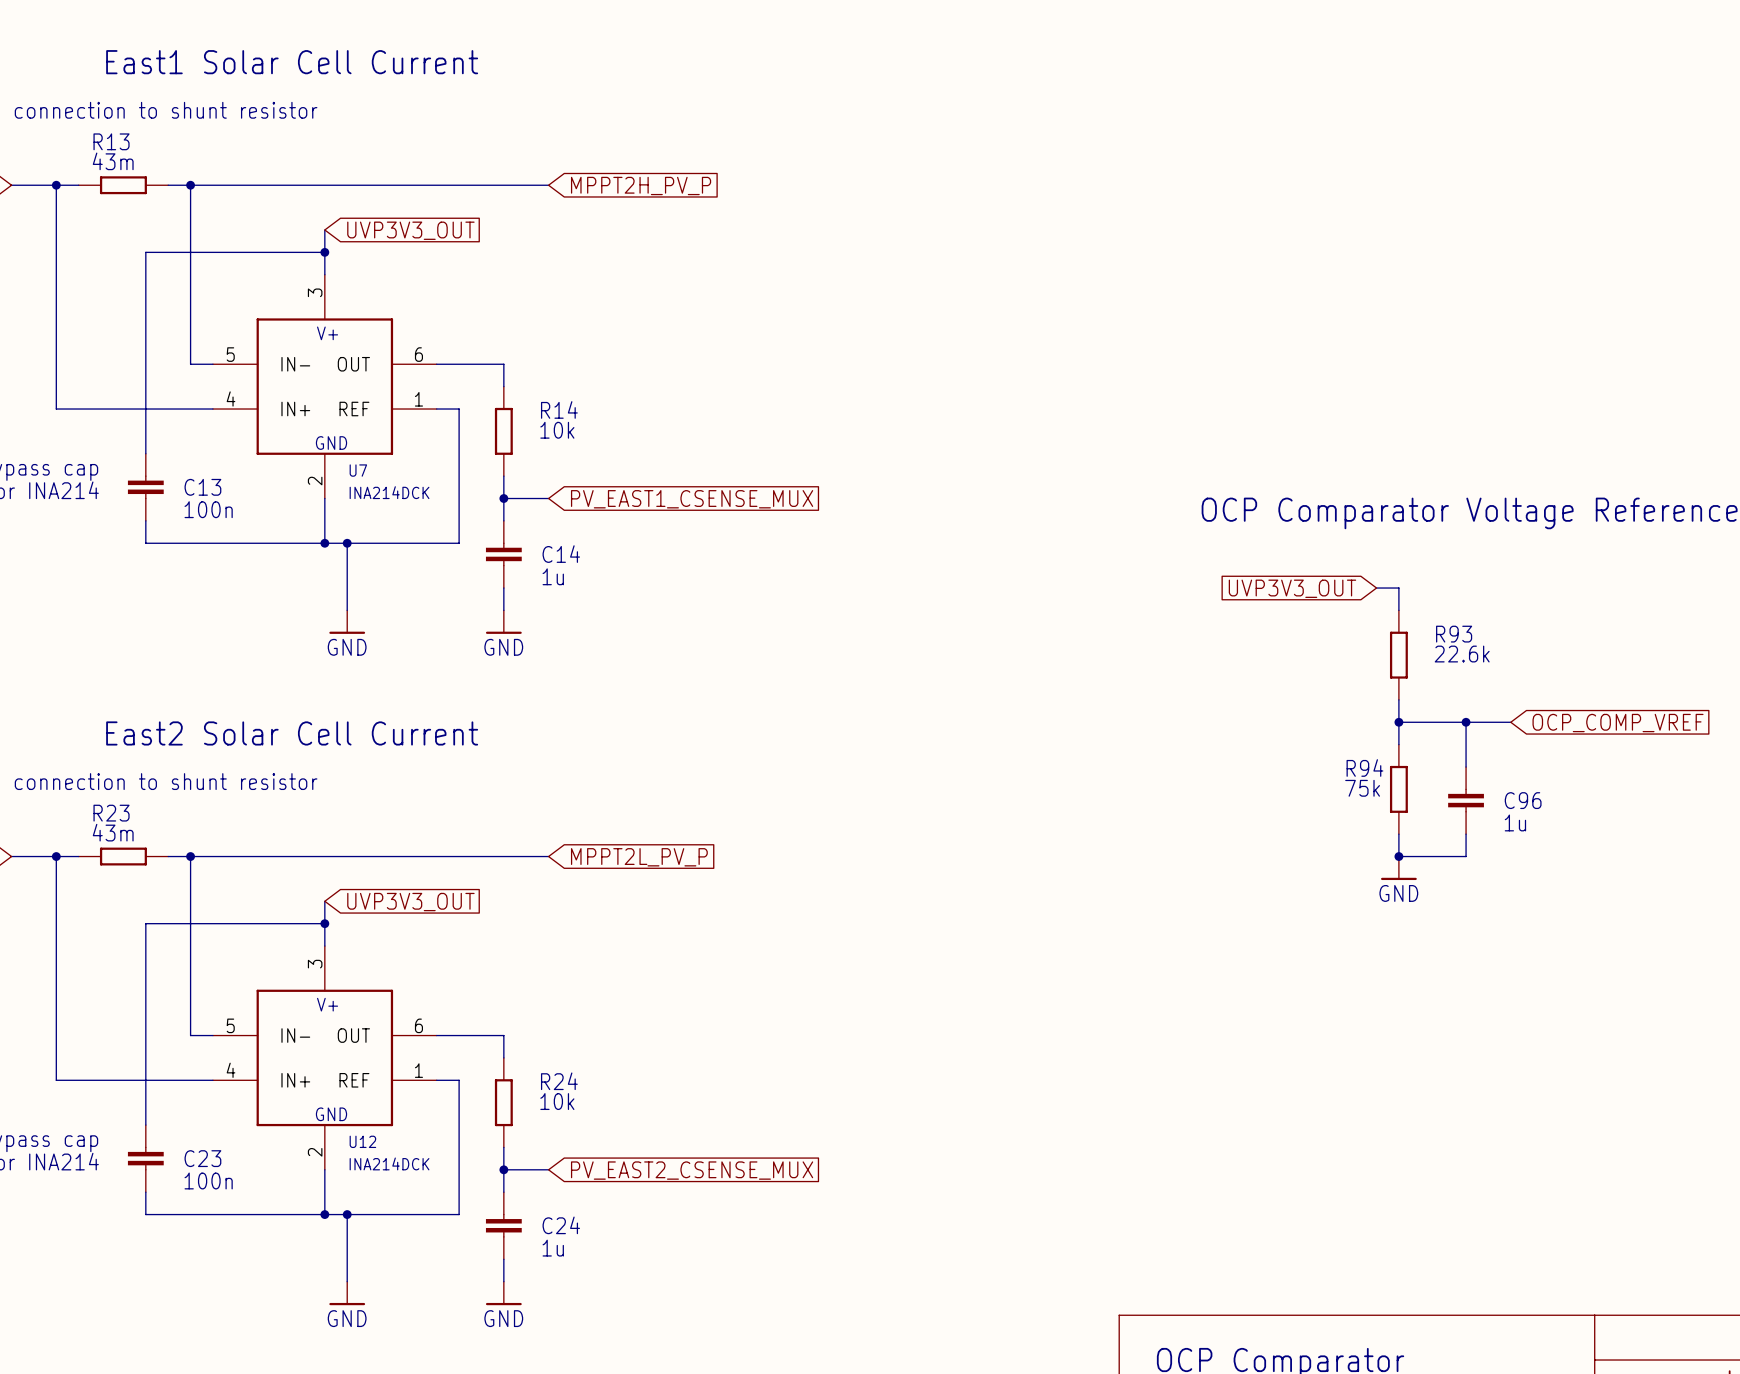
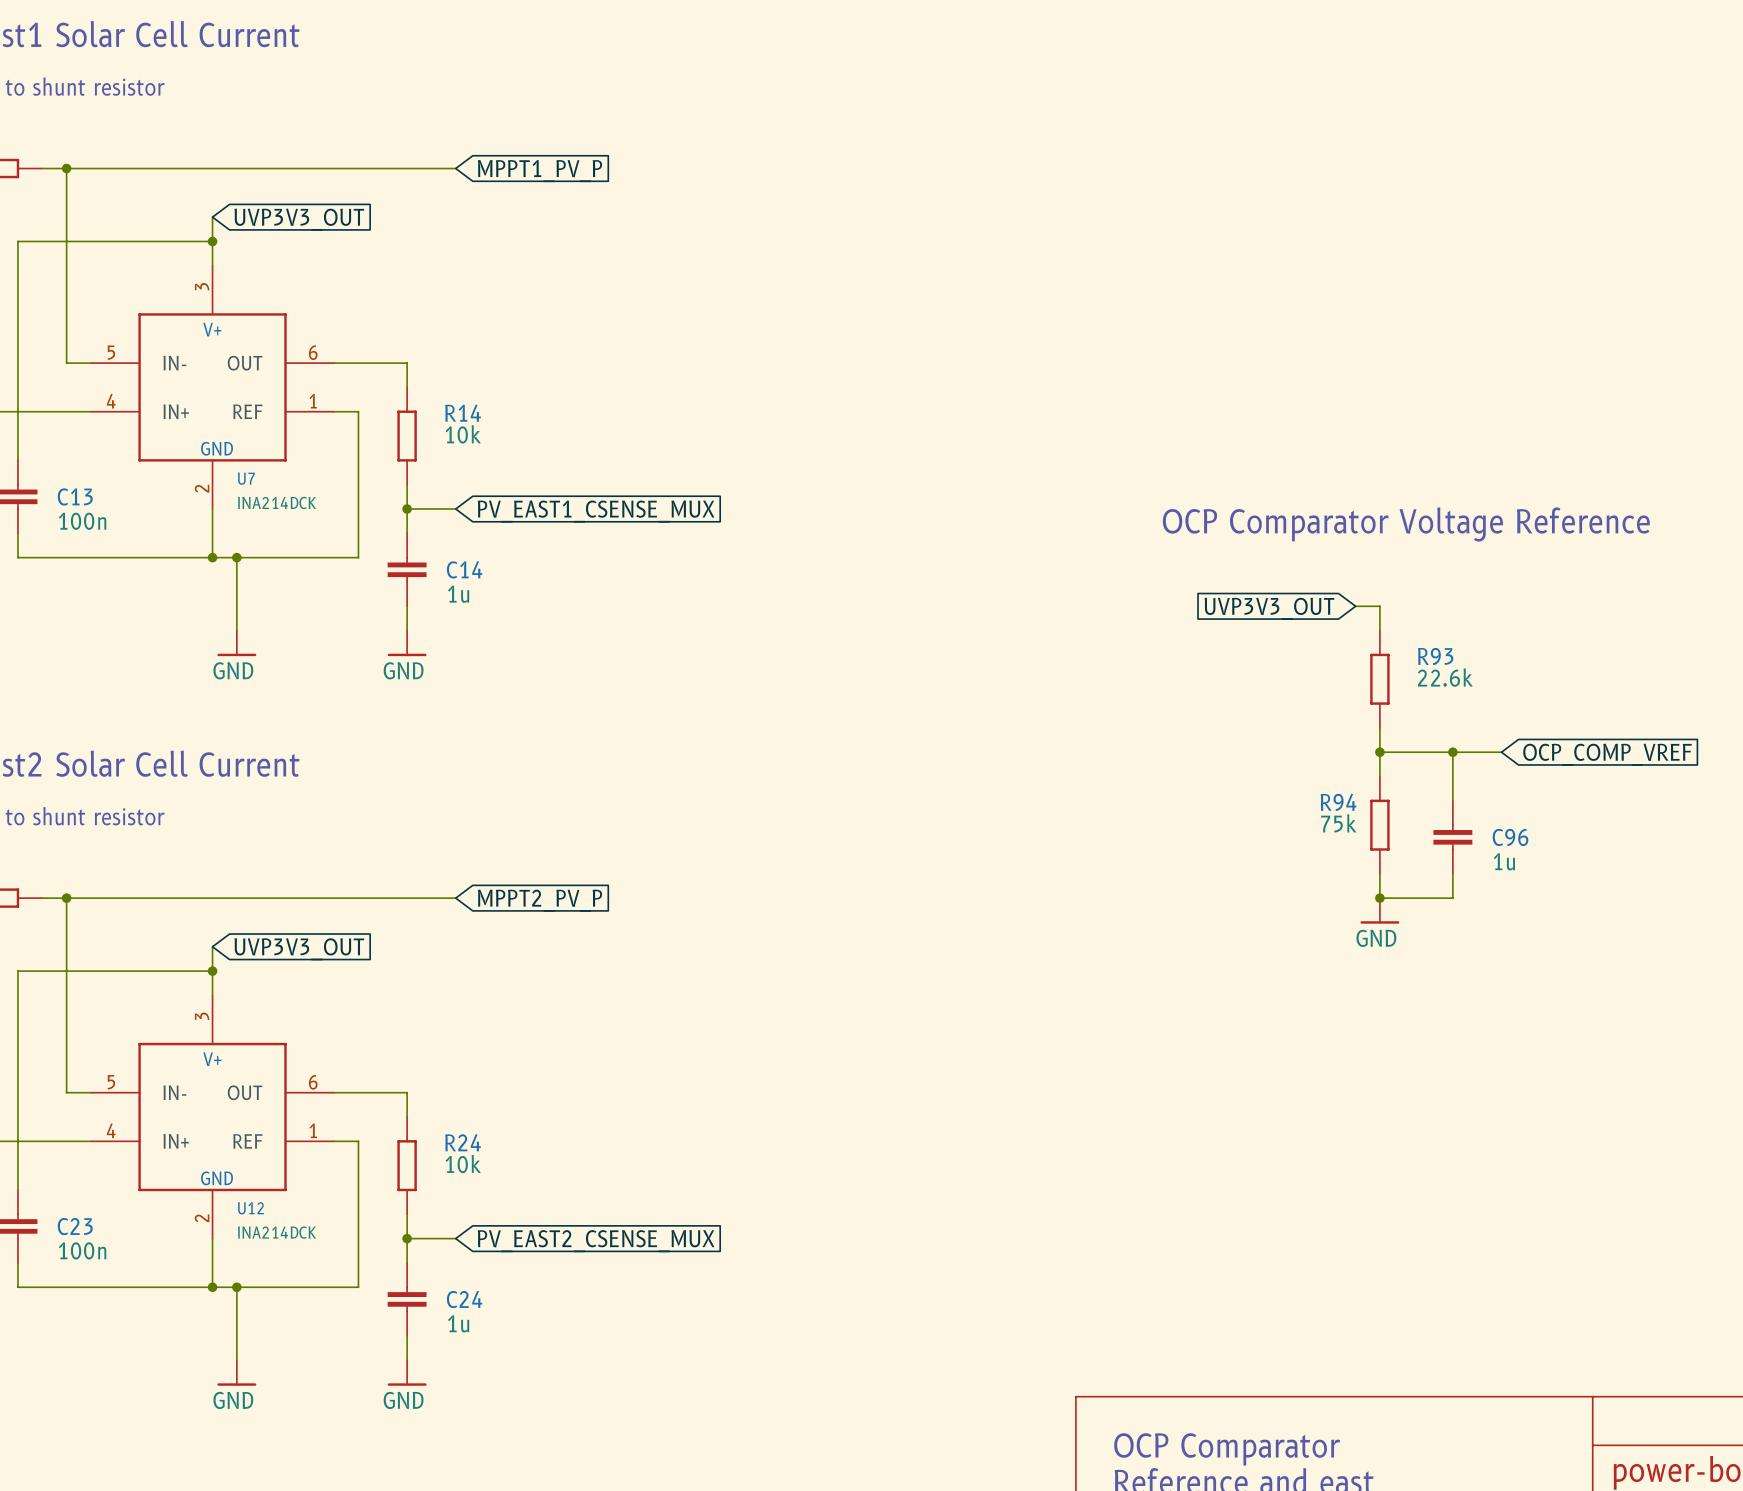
global label: MPPT2H_PV_P (641, 185) -> MPPT1_PV_P (539, 171)
global label: MPPT2L_PV_P (639, 857) -> MPPT2_PV_P (539, 900)

